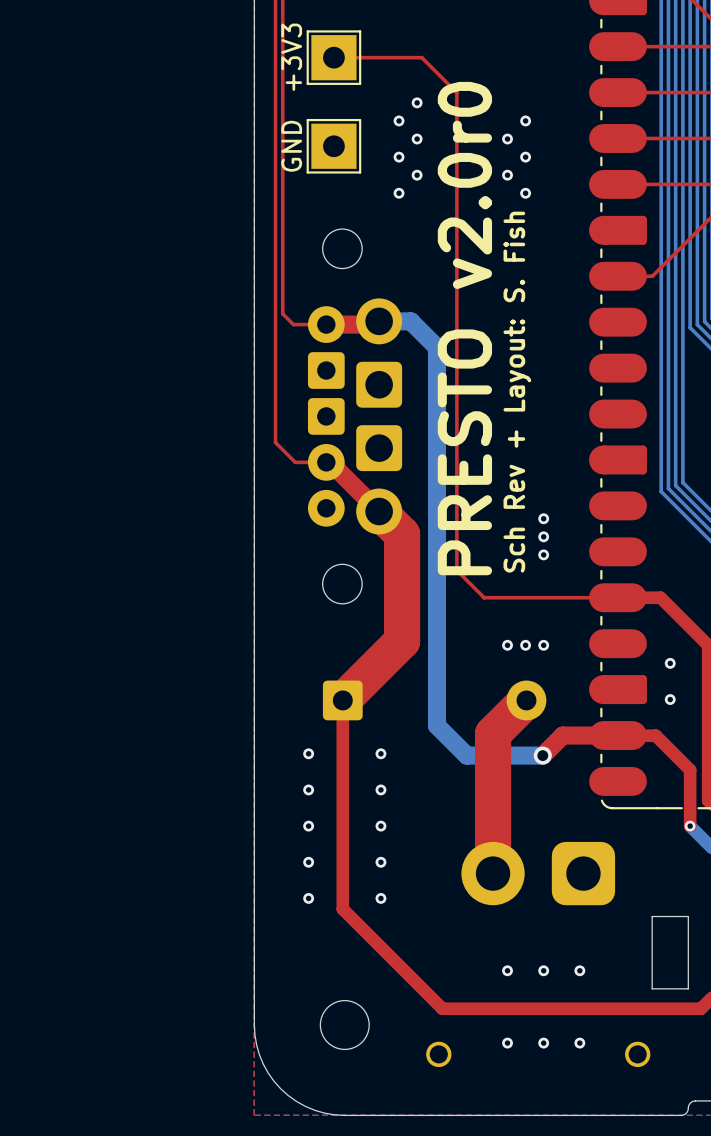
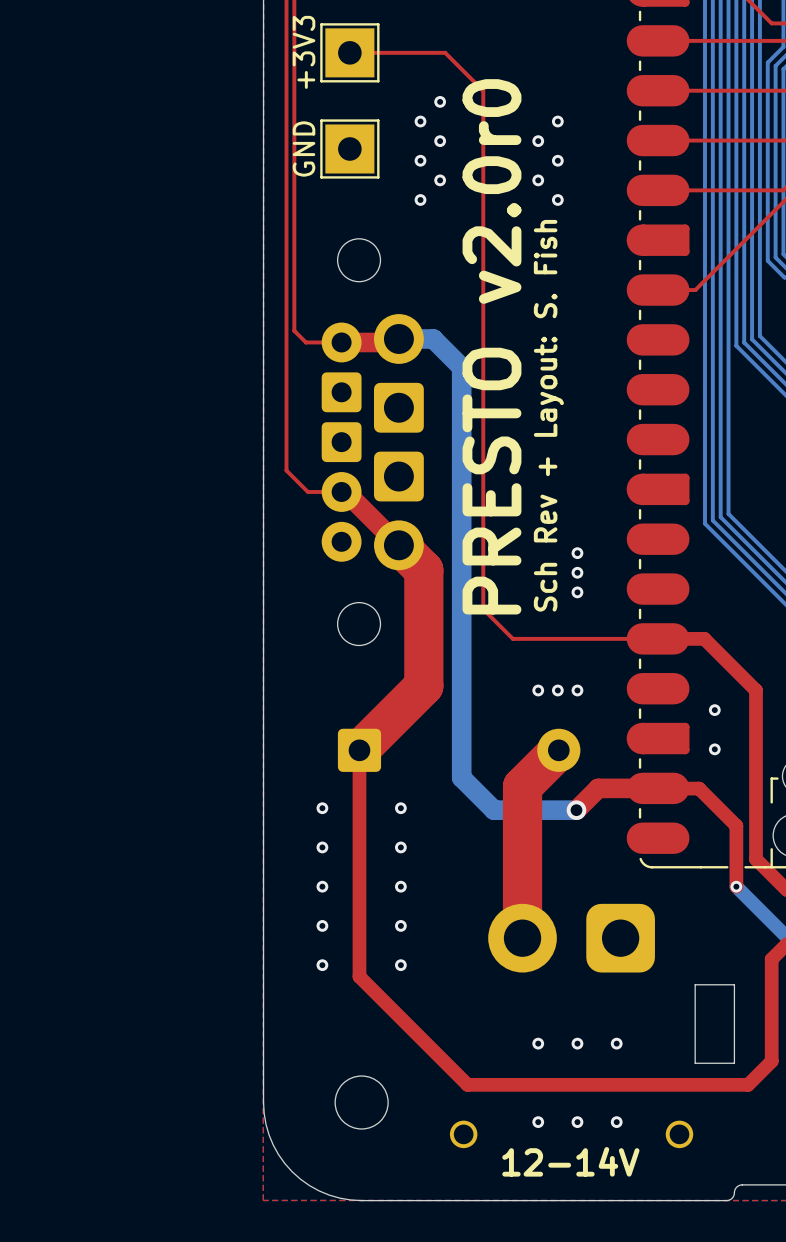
text: none -> 12-14V (570, 1161)

